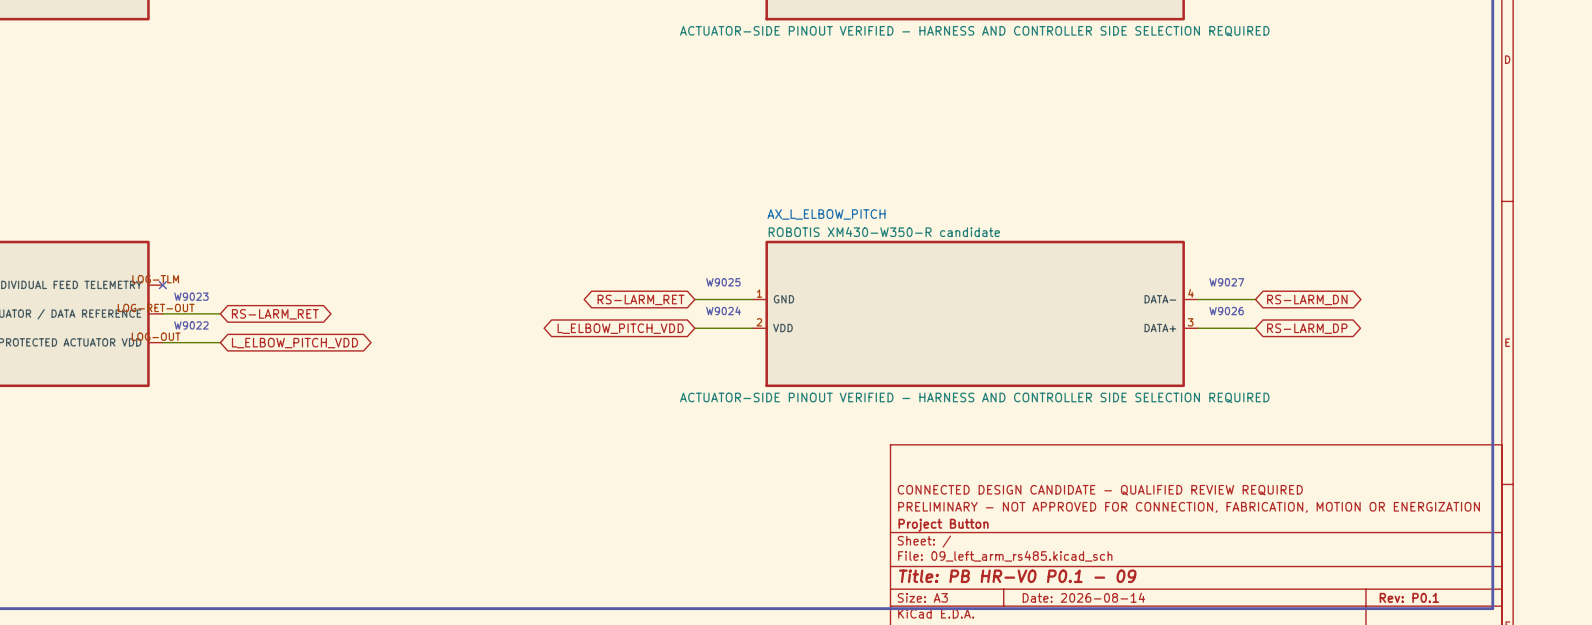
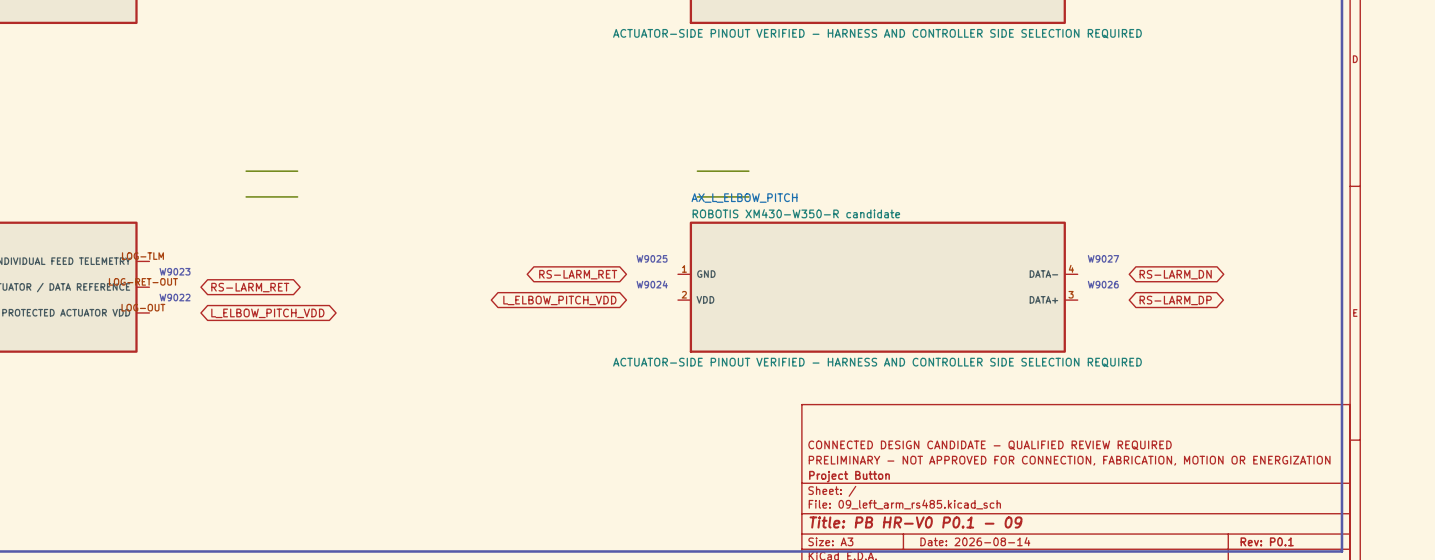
wire: none -> (246, 171) (297, 171)
wire: none -> (246, 196) (297, 196)
no-connect mark: (162, 285) -> none
wire: (694, 299) (752, 299) -> (697, 171) (748, 171)
wire: (1198, 299) (1255, 299) -> none
wire: (162, 313) (220, 313) -> none
wire: (694, 328) (752, 328) -> (697, 196) (748, 196)
wire: (1198, 328) (1255, 328) -> none
wire: (162, 342) (220, 342) -> none

